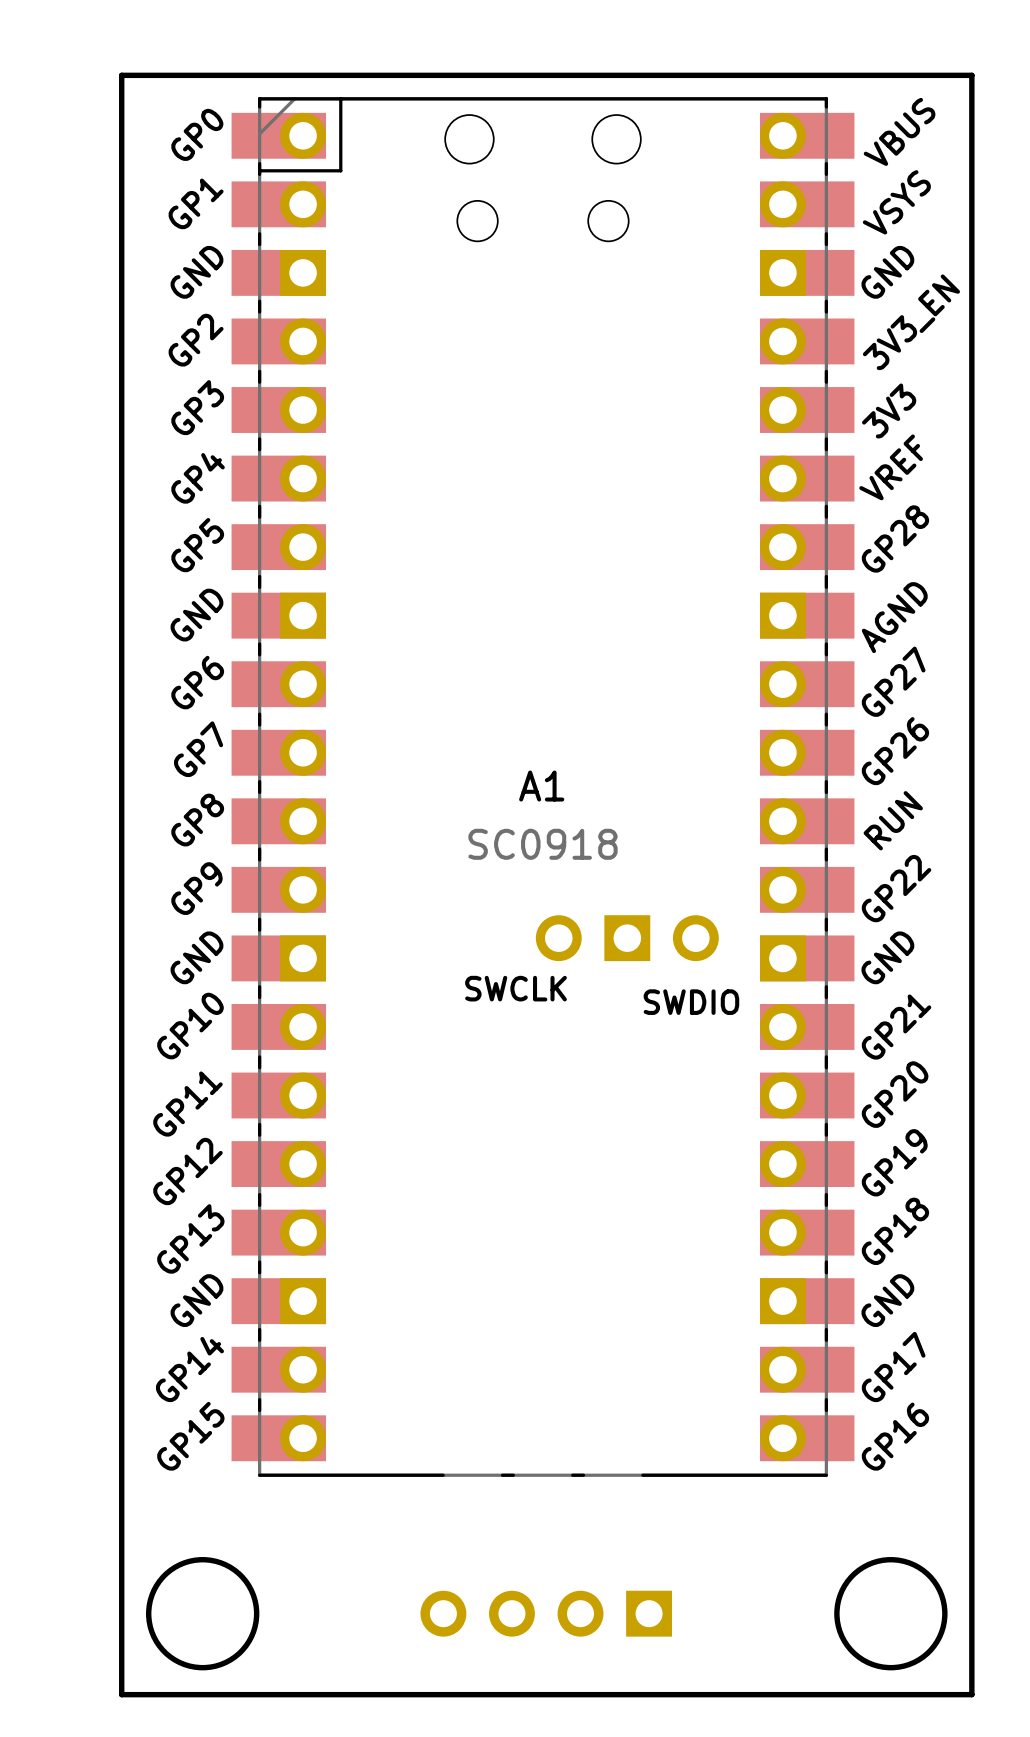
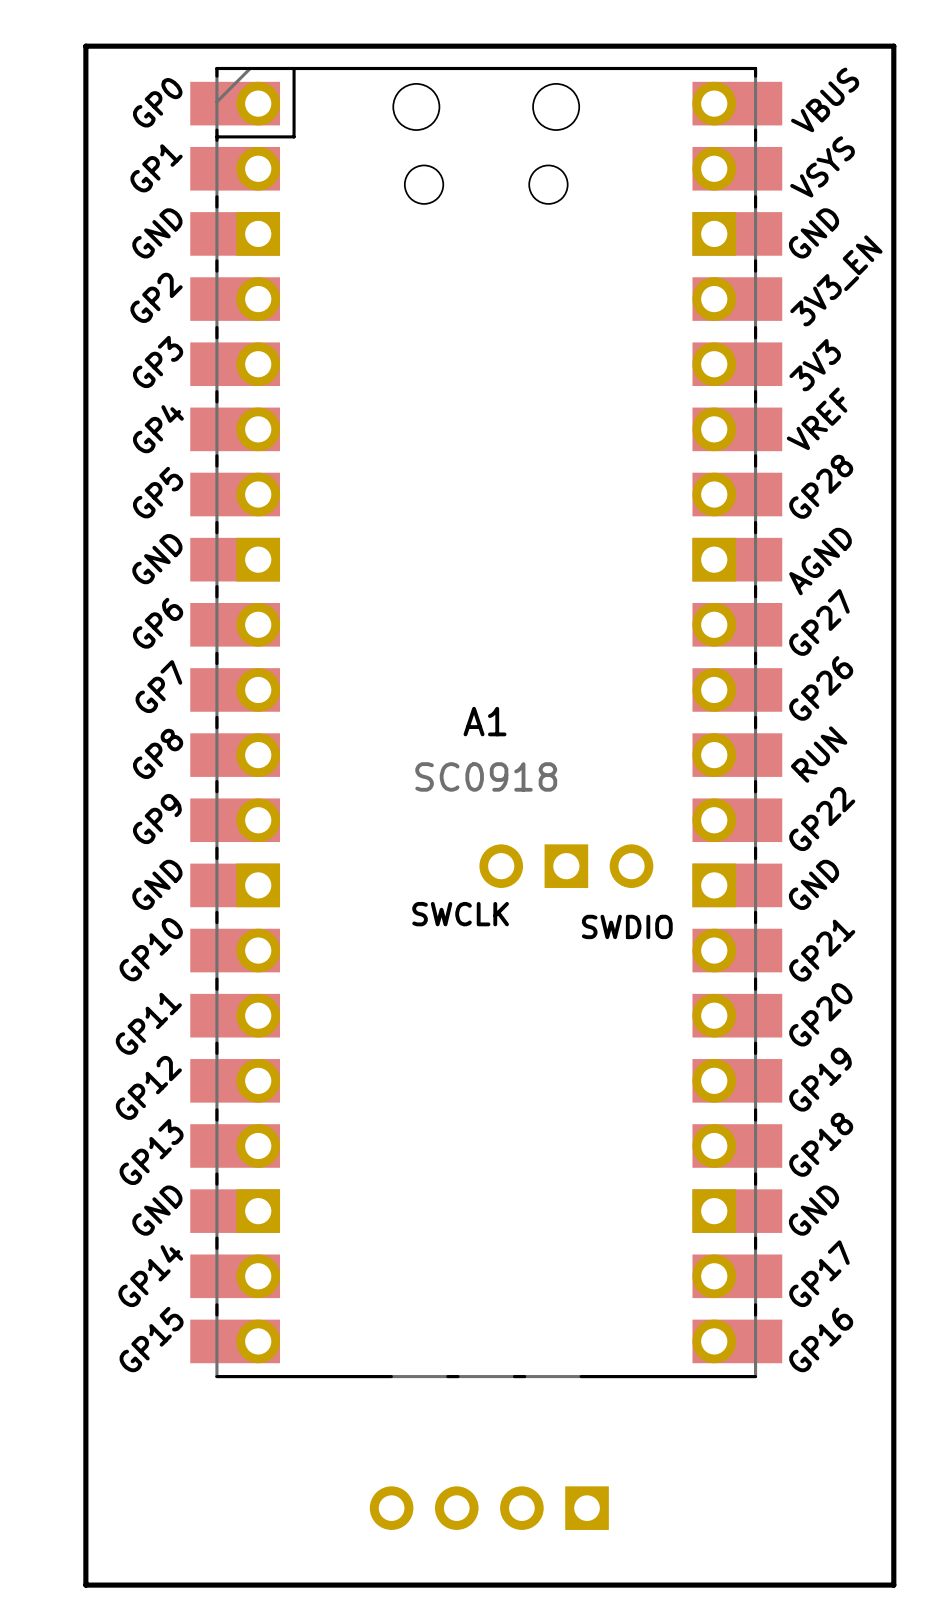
round board edge: [146, 1557, 260, 1671] -> none
round board edge: [834, 1557, 948, 1671] -> none

